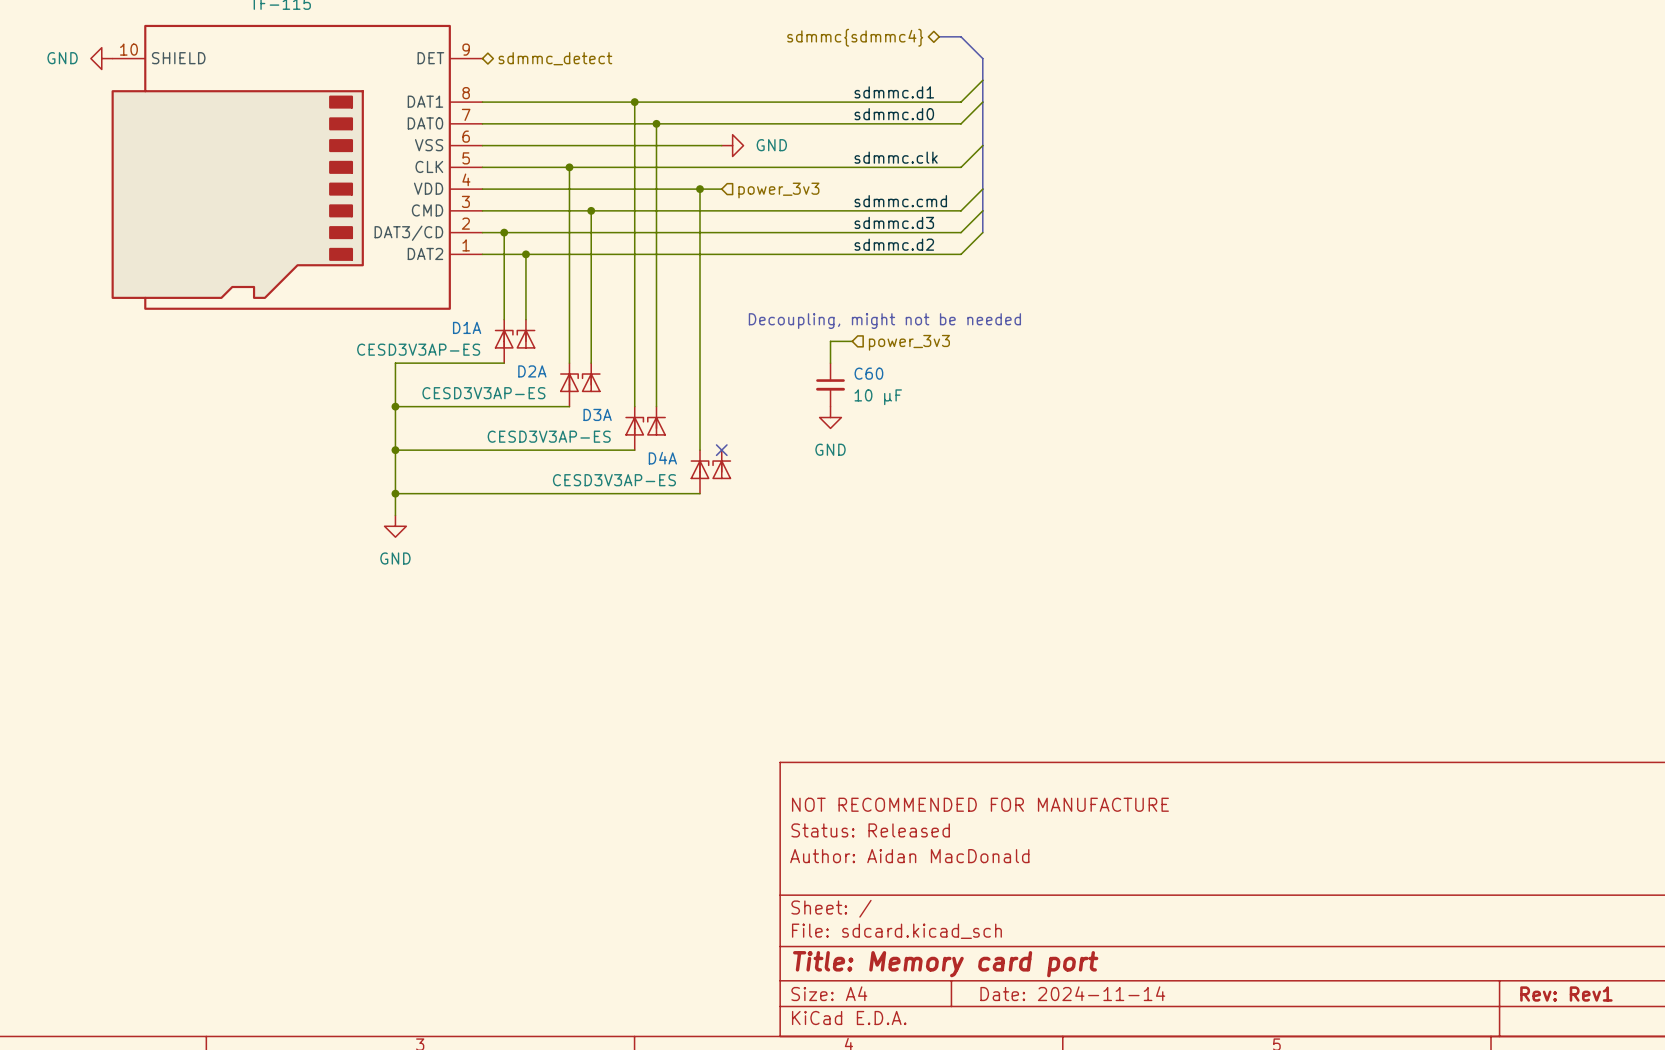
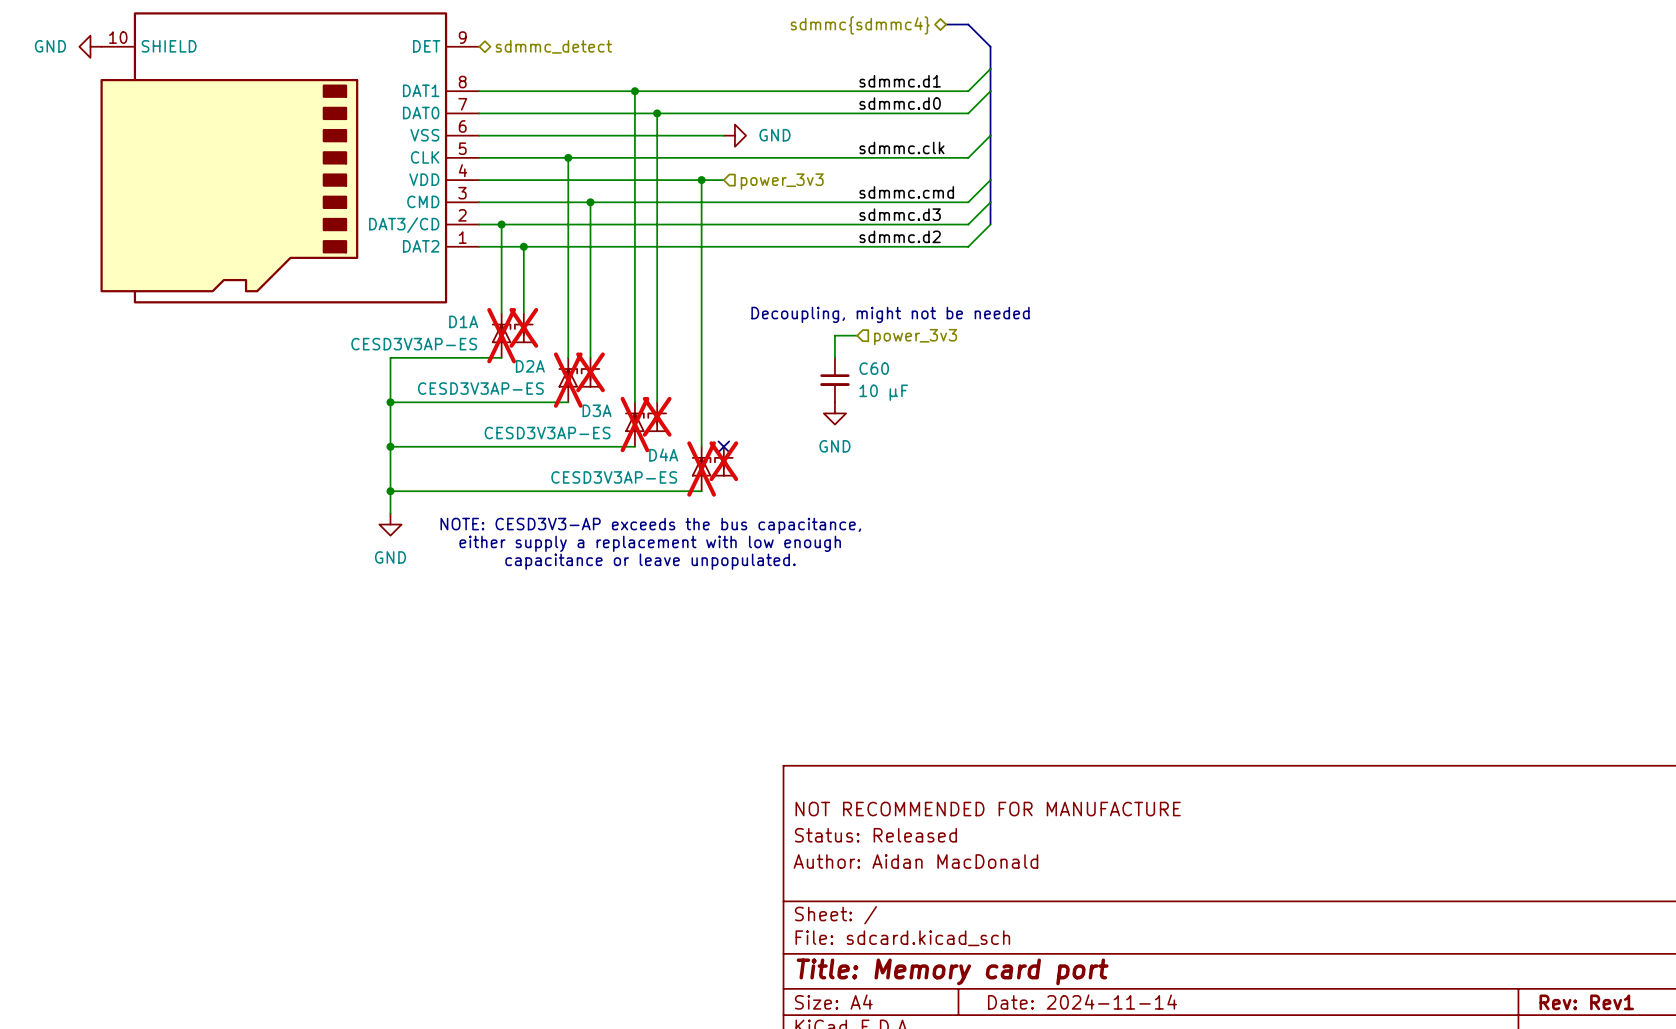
part do-not-place cross: none -> (523, 327)
D1A do-not-place cross: none -> (501, 335)
part do-not-place cross: none -> (590, 372)
D2A do-not-place cross: none -> (568, 380)
part do-not-place cross: none -> (657, 416)
D3A do-not-place cross: none -> (634, 424)
part do-not-place cross: none -> (723, 461)
D4A do-not-place cross: none -> (701, 468)
text: none -> NOTE: CESD3V3-AP exceeds the bus capacitance, (650, 525)
text: none -> either supply a replacement with low enough (650, 543)
text: none -> capacitance or leave unpopulated. (650, 561)

